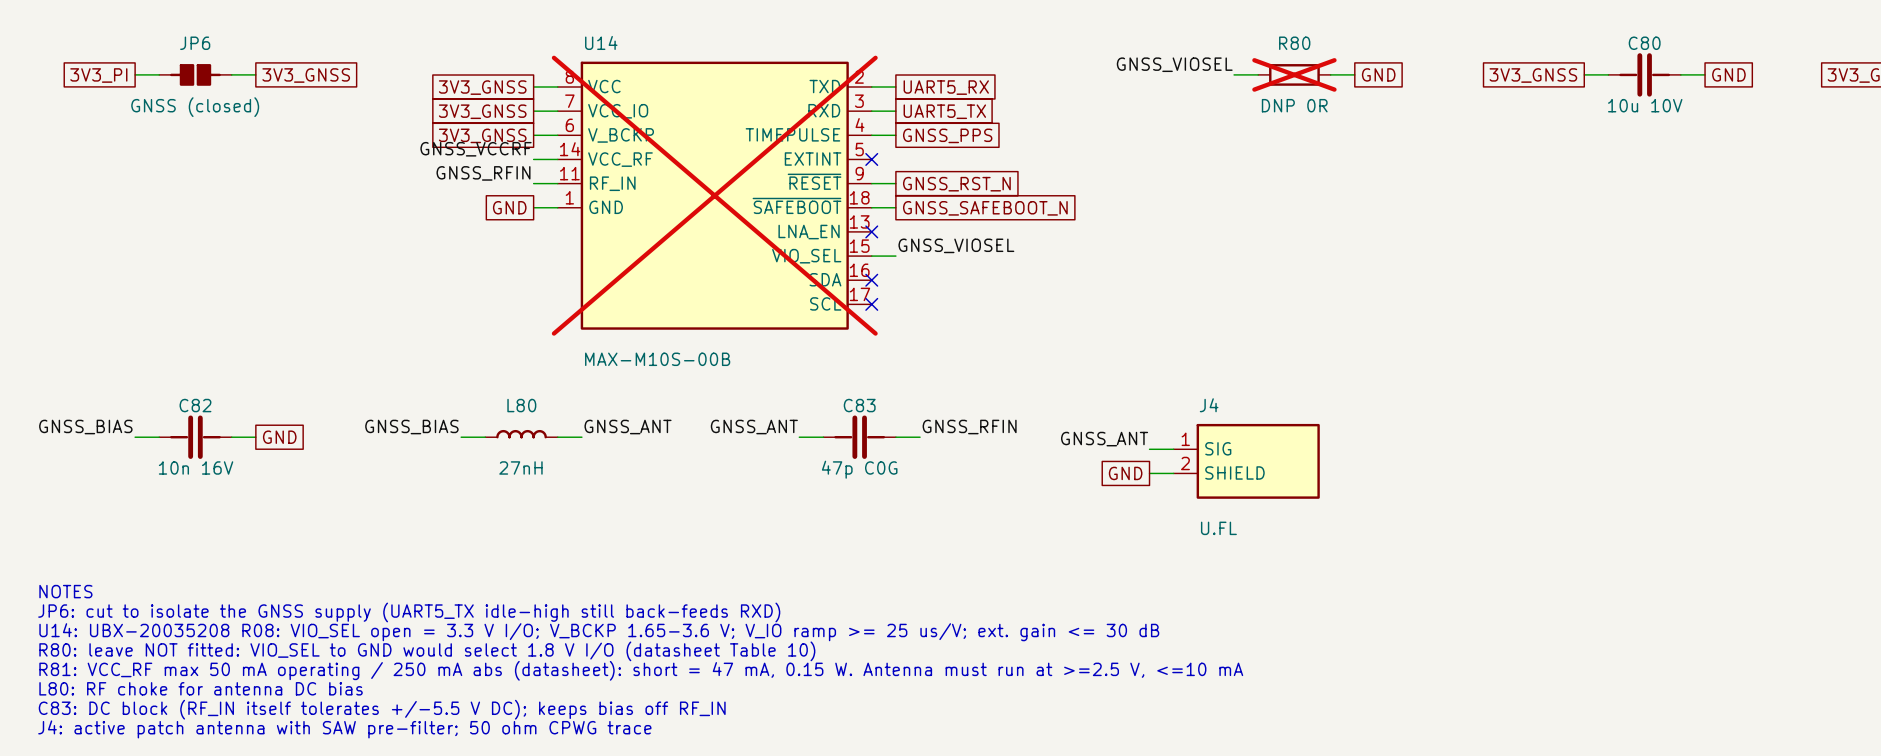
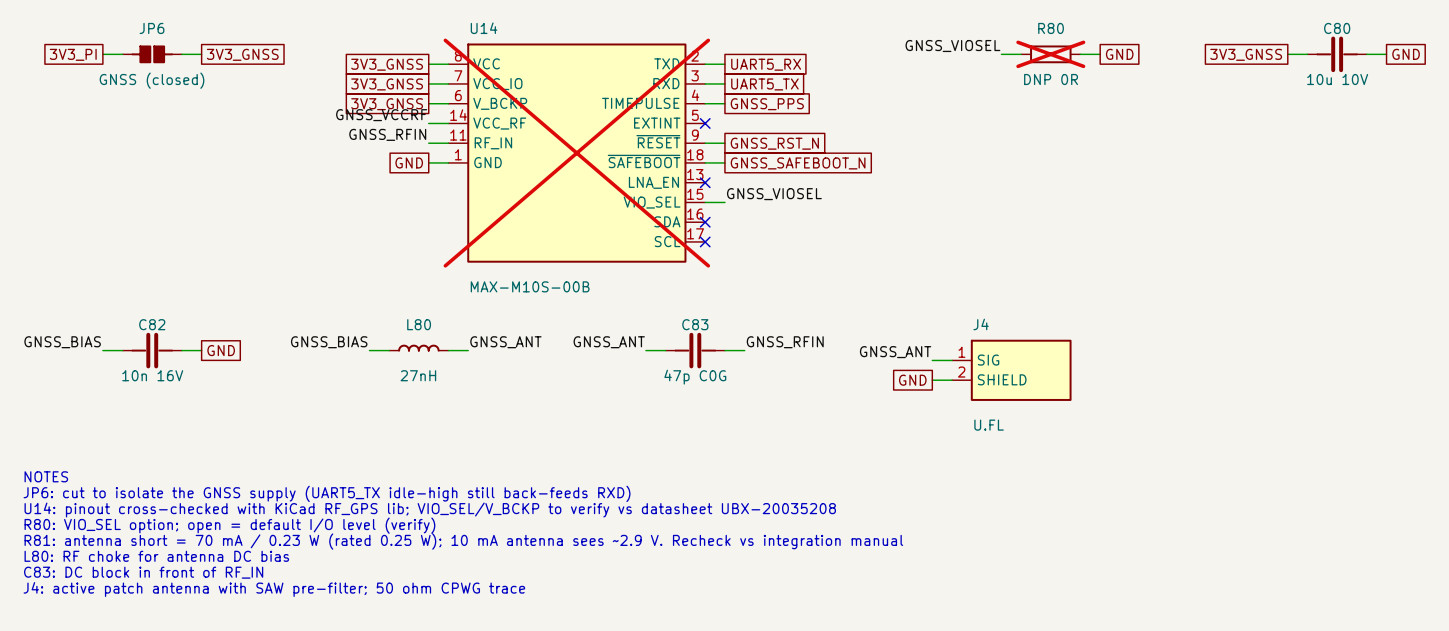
text: U14: UBX-20035208 R08: VIO_SEL open = 3.3 V I/O; V_BCKP 1.65-3.6 V; V_IO ramp >= 25 us/V; ext. gain <= 30 dB (599, 632) -> U14: pinout cross-checked with KiCad RF_GPS lib; VIO_SEL/V_BCKP to verify vs datasheet UBX-20035208 (430, 510)
text: R80: leave NOT fitted: VIO_SEL to GND would select 1.8 V I/O (datasheet Table 10) (427, 651) -> R80: VIO_SEL option; open = default I/O level (verify) (229, 525)
text: R81: VCC_RF max 50 mA operating / 250 mA abs (datasheet): short = 47 mA, 0.15 W. Antenna must run at >=2.5 V, <=10 mA (641, 670) -> R81: antenna short = 70 mA / 0.23 W (rated 0.25 W); 10 mA antenna sees ~2.9 V. Recheck vs integration manual (463, 541)
text: C83: DC block (RF_IN itself tolerates +/-5.5 V DC); keeps bias off RF_IN (382, 709) -> C83: DC block in front of RF_IN (143, 572)

